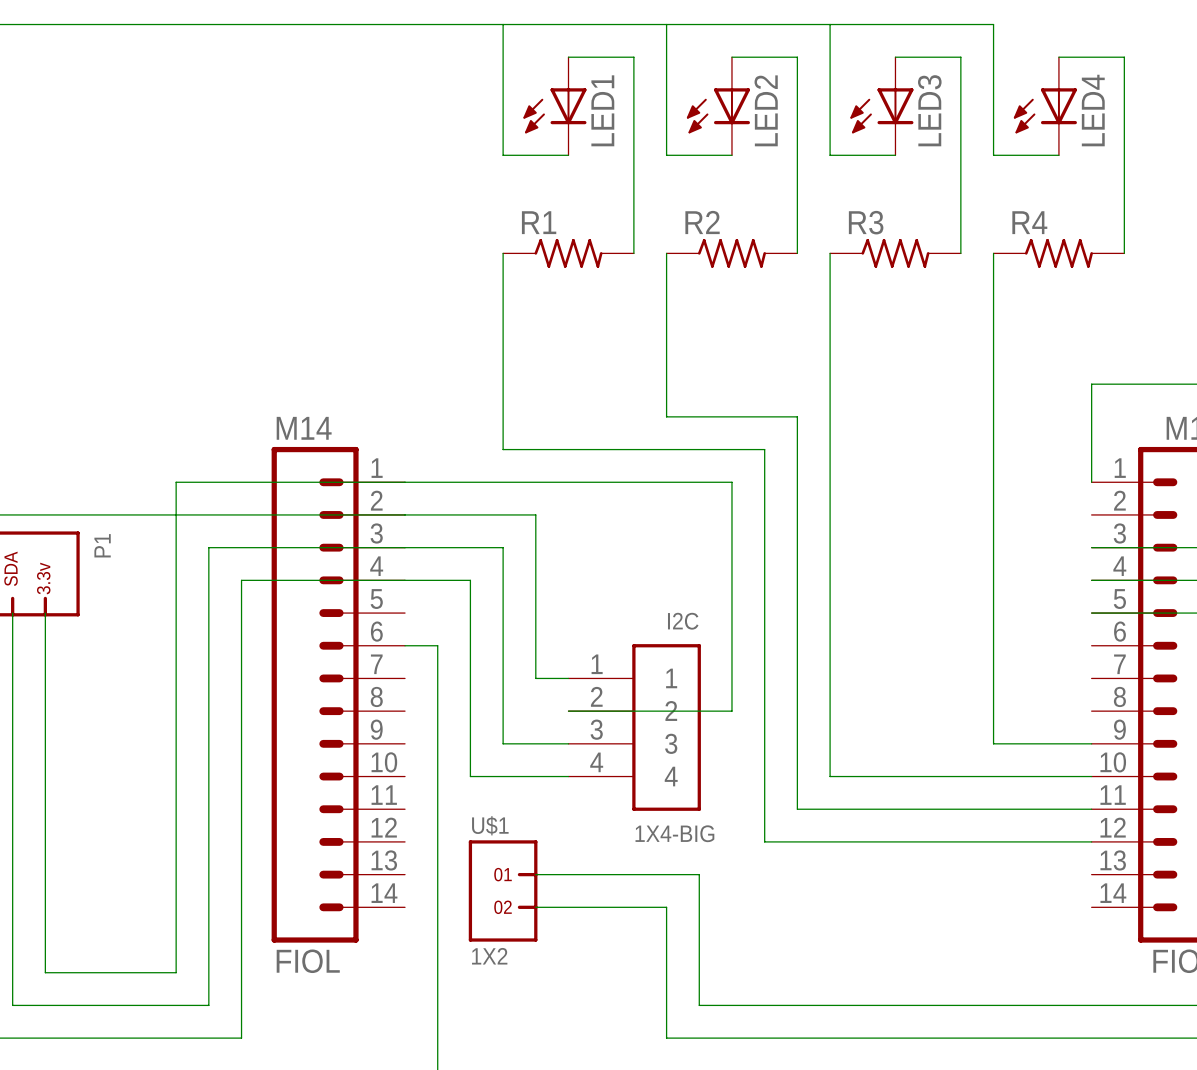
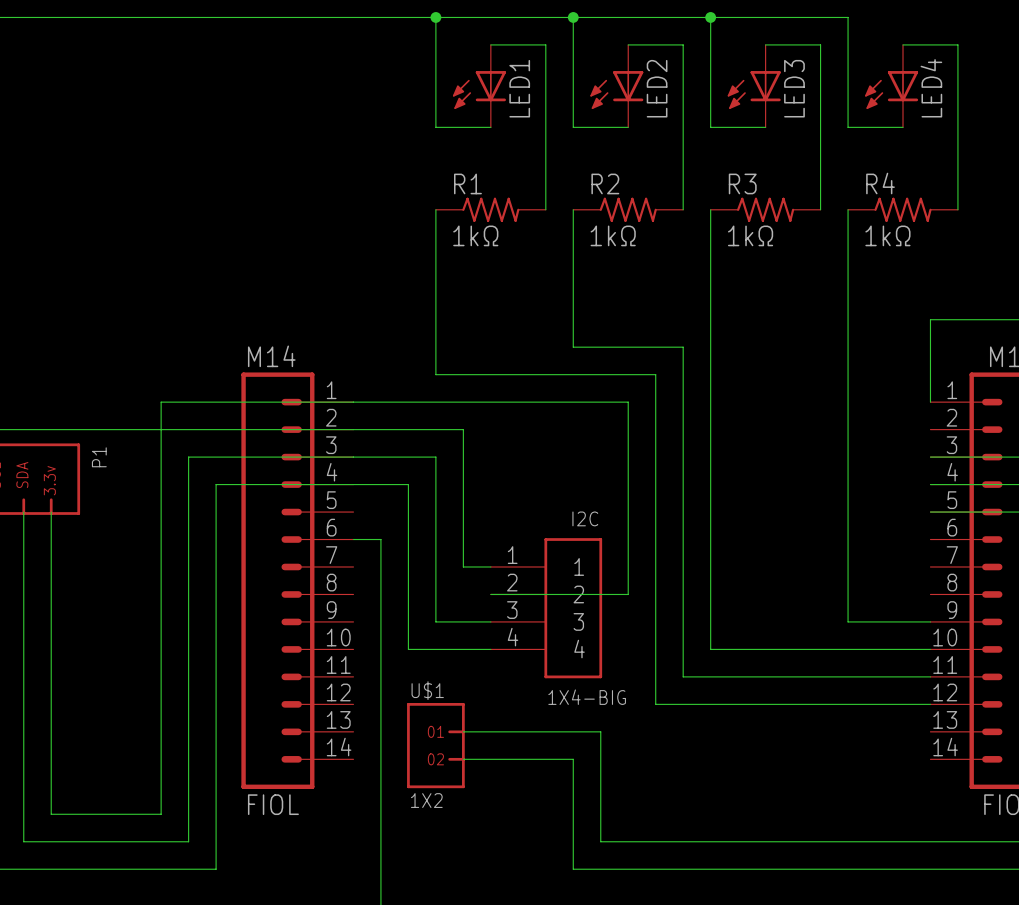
junction: none -> (435, 17)
junction: none -> (573, 17)
junction: none -> (710, 17)
R1 value: none -> 1kΩ (475, 235)
R2 value: none -> 1kΩ (613, 235)
R3 value: none -> 1kΩ (750, 235)
R4 value: none -> 1kΩ (887, 235)

